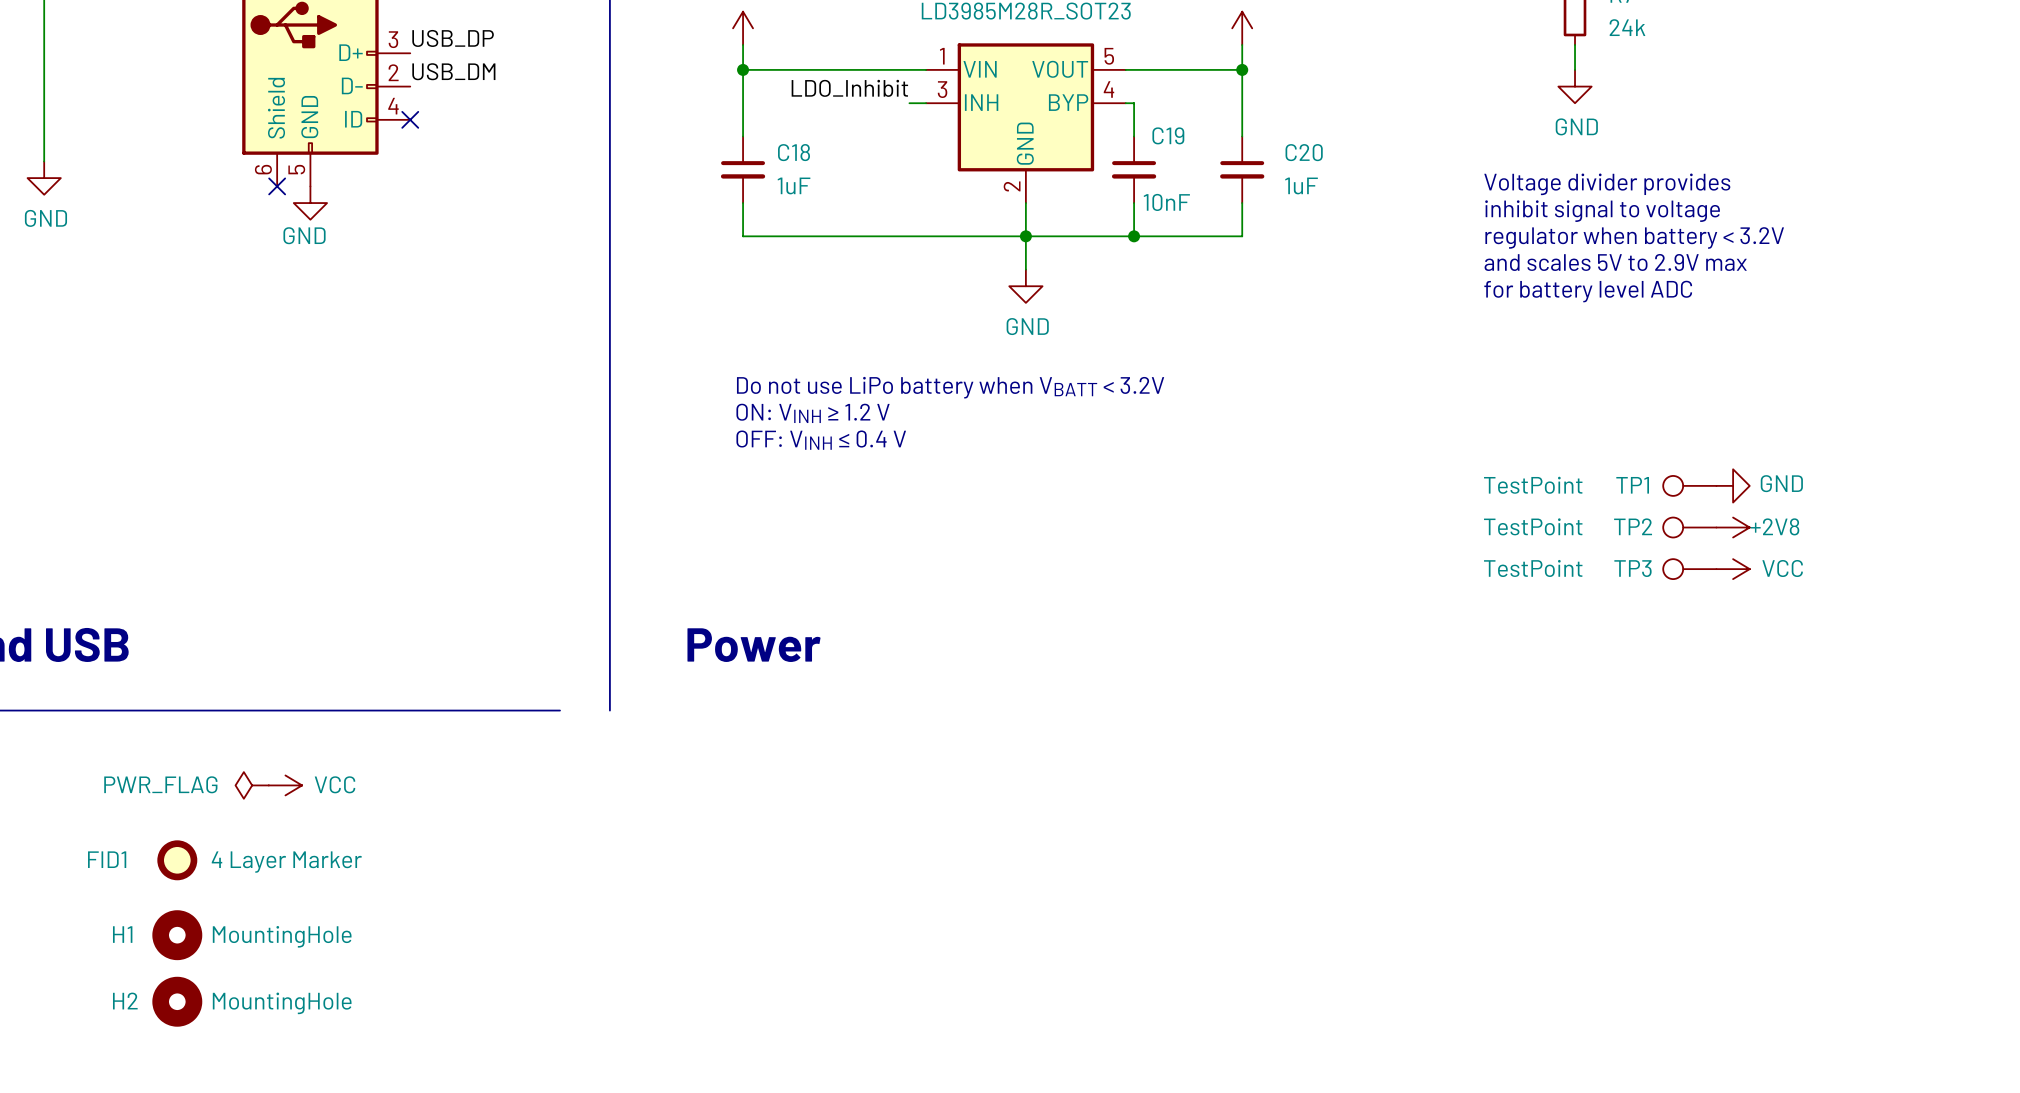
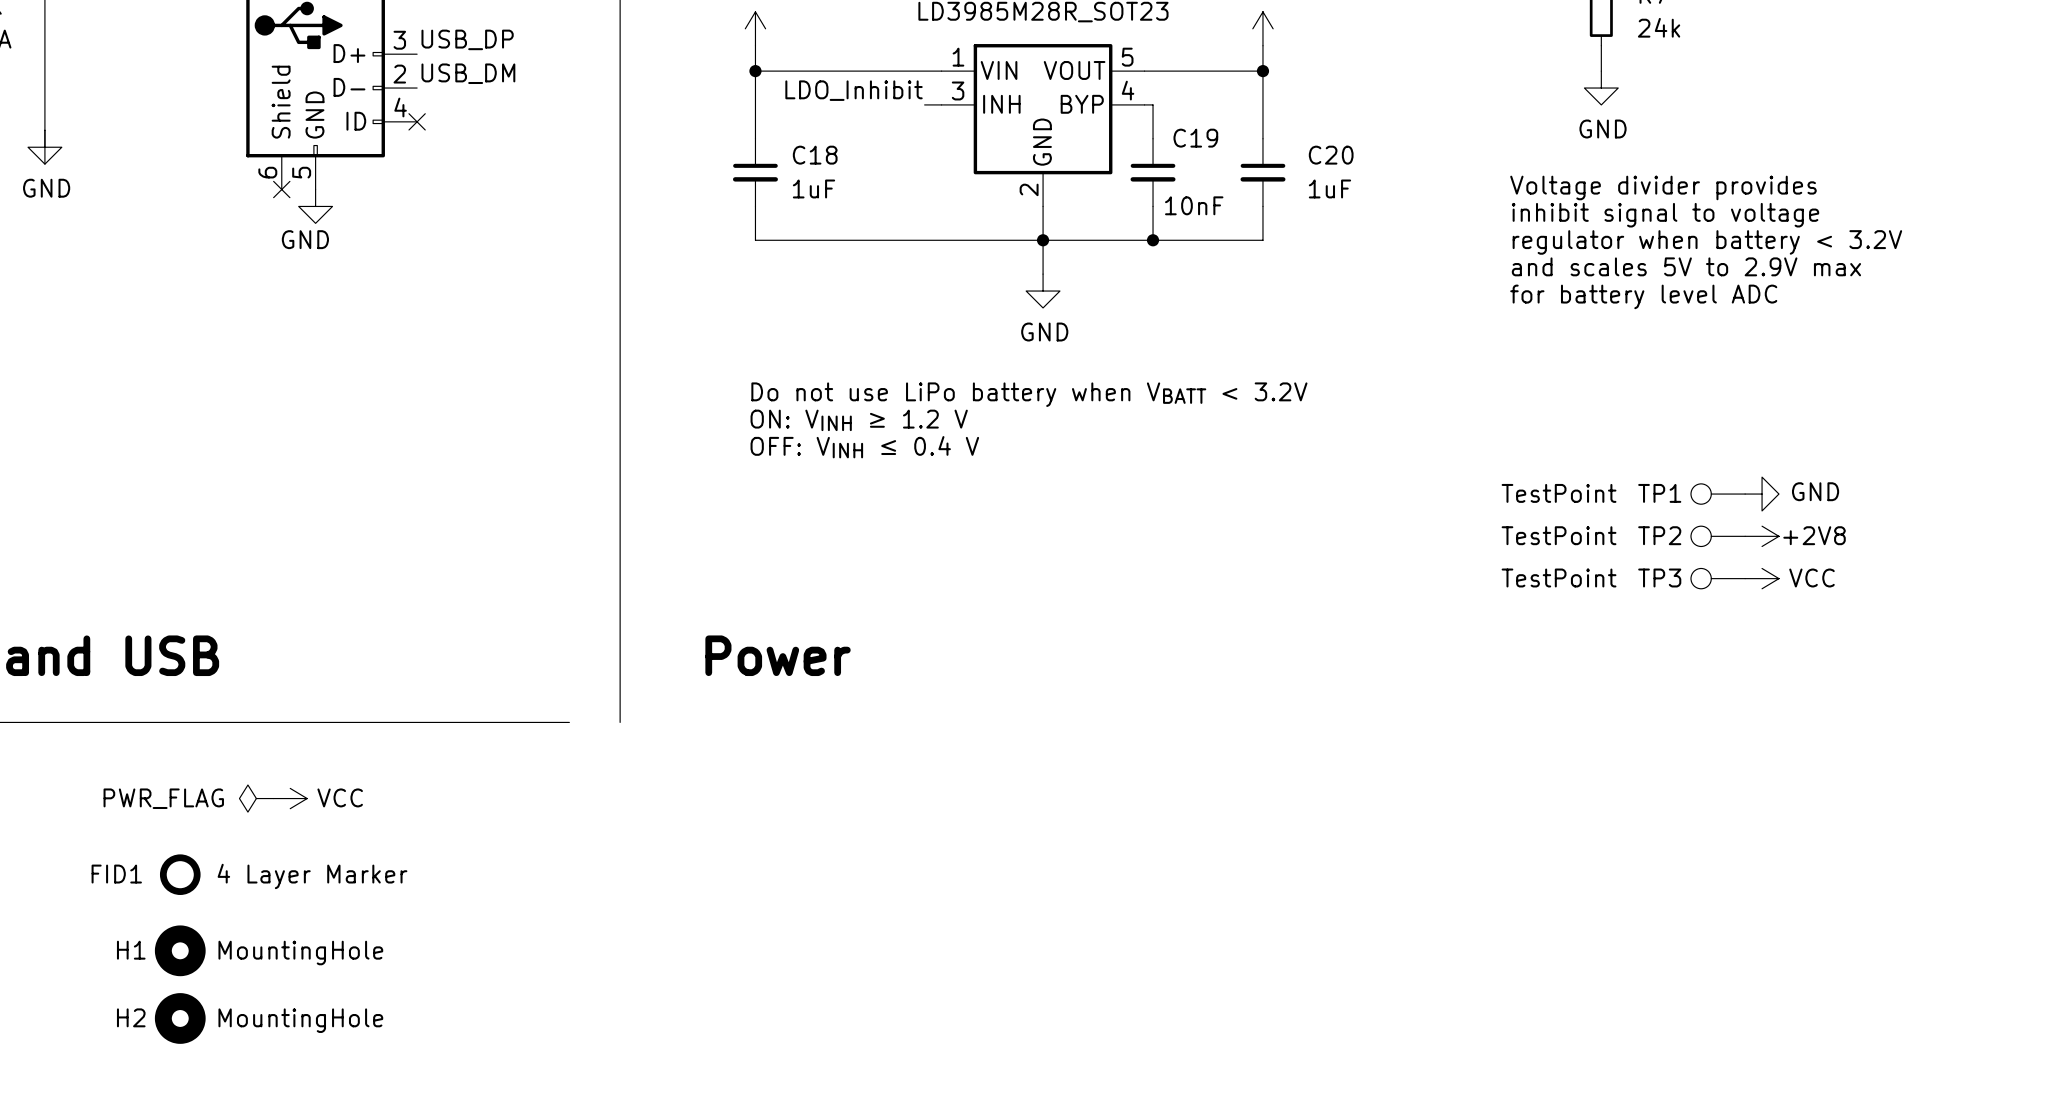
power symbol position: GND (44, 178) -> GND (44, 147)

